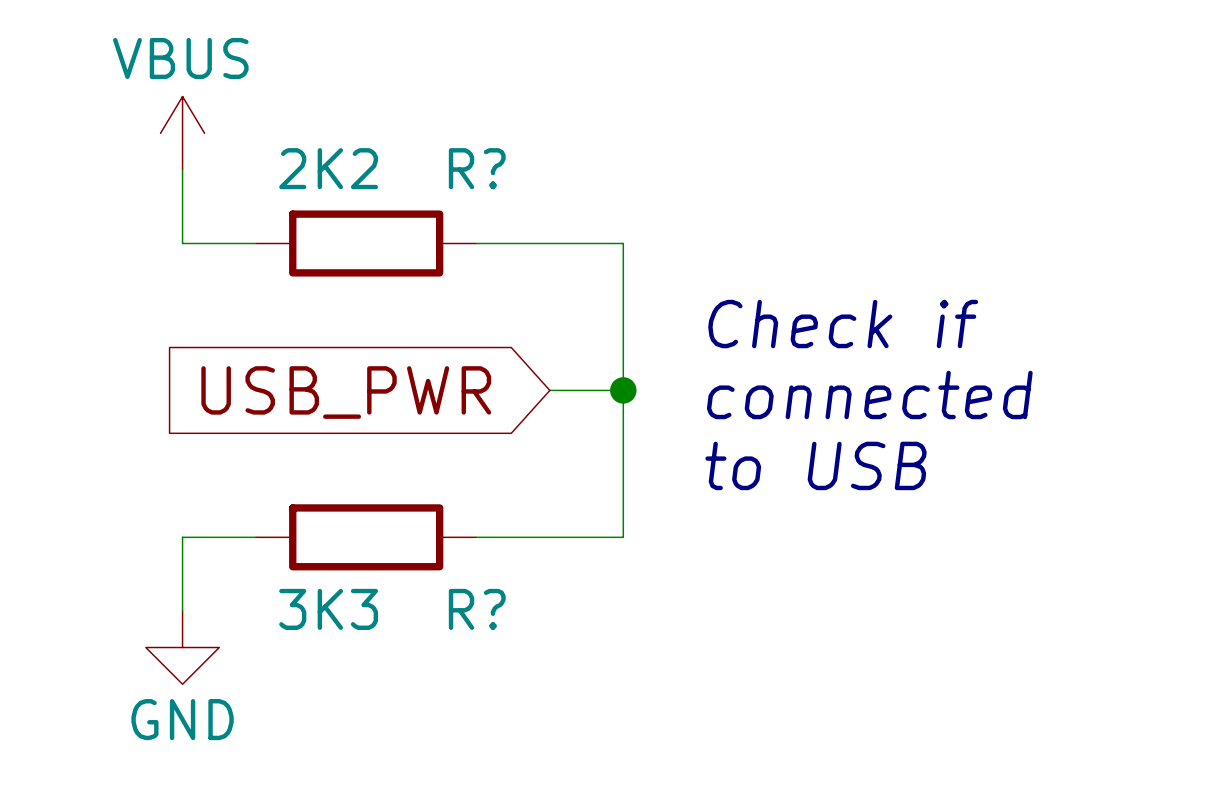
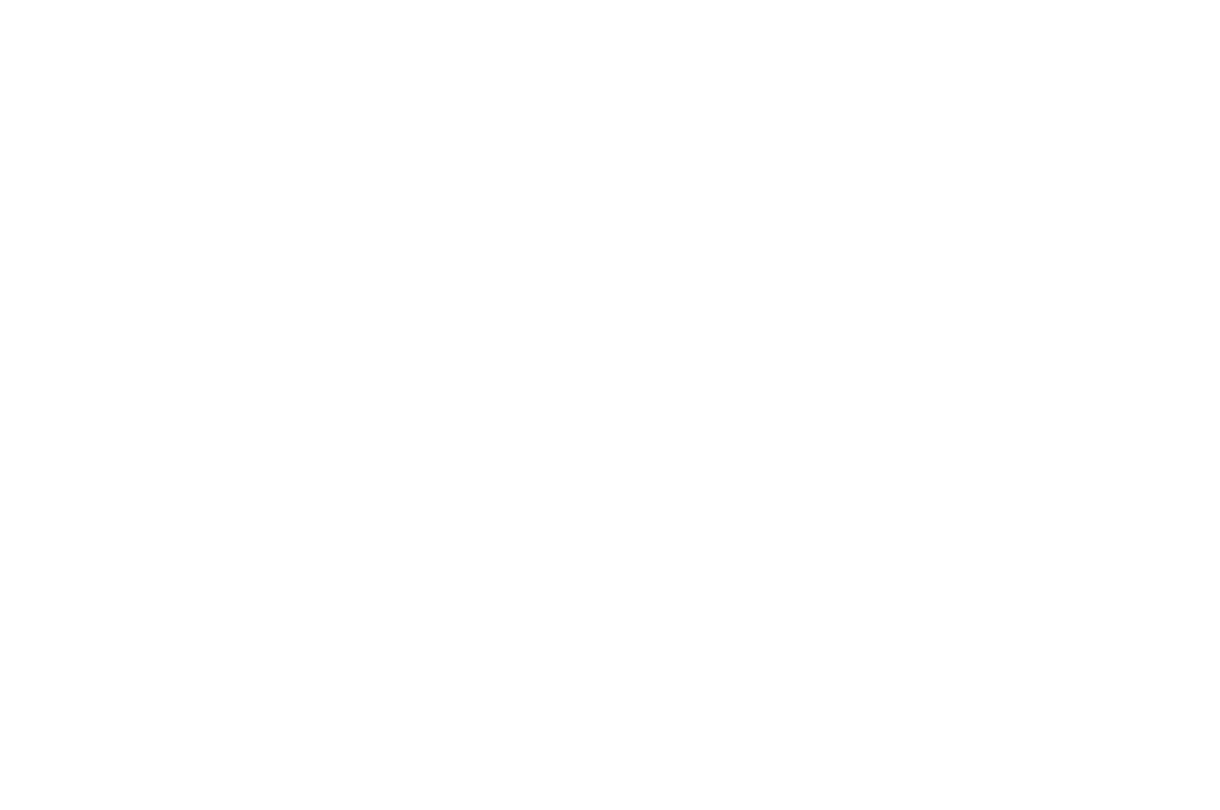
power symbol: VBUS (182, 133) -> none
wire: (182, 170) (182, 243) (256, 243) -> none
R?: 2K2 (366, 243) -> none
wire: (476, 243) (623, 243) (623, 537) (476, 537) -> none
text: Check if (843, 324) -> none
wire: (549, 390) (623, 390) -> none
junction: (623, 390) -> none
global label: USB_PWR (346, 392) -> none
text: connected (869, 394) -> none
text: to USB (816, 465) -> none
wire: (256, 537) (182, 537) (182, 610) -> none
R?: 3K3 (366, 537) -> none
power symbol: GND (182, 647) -> none

